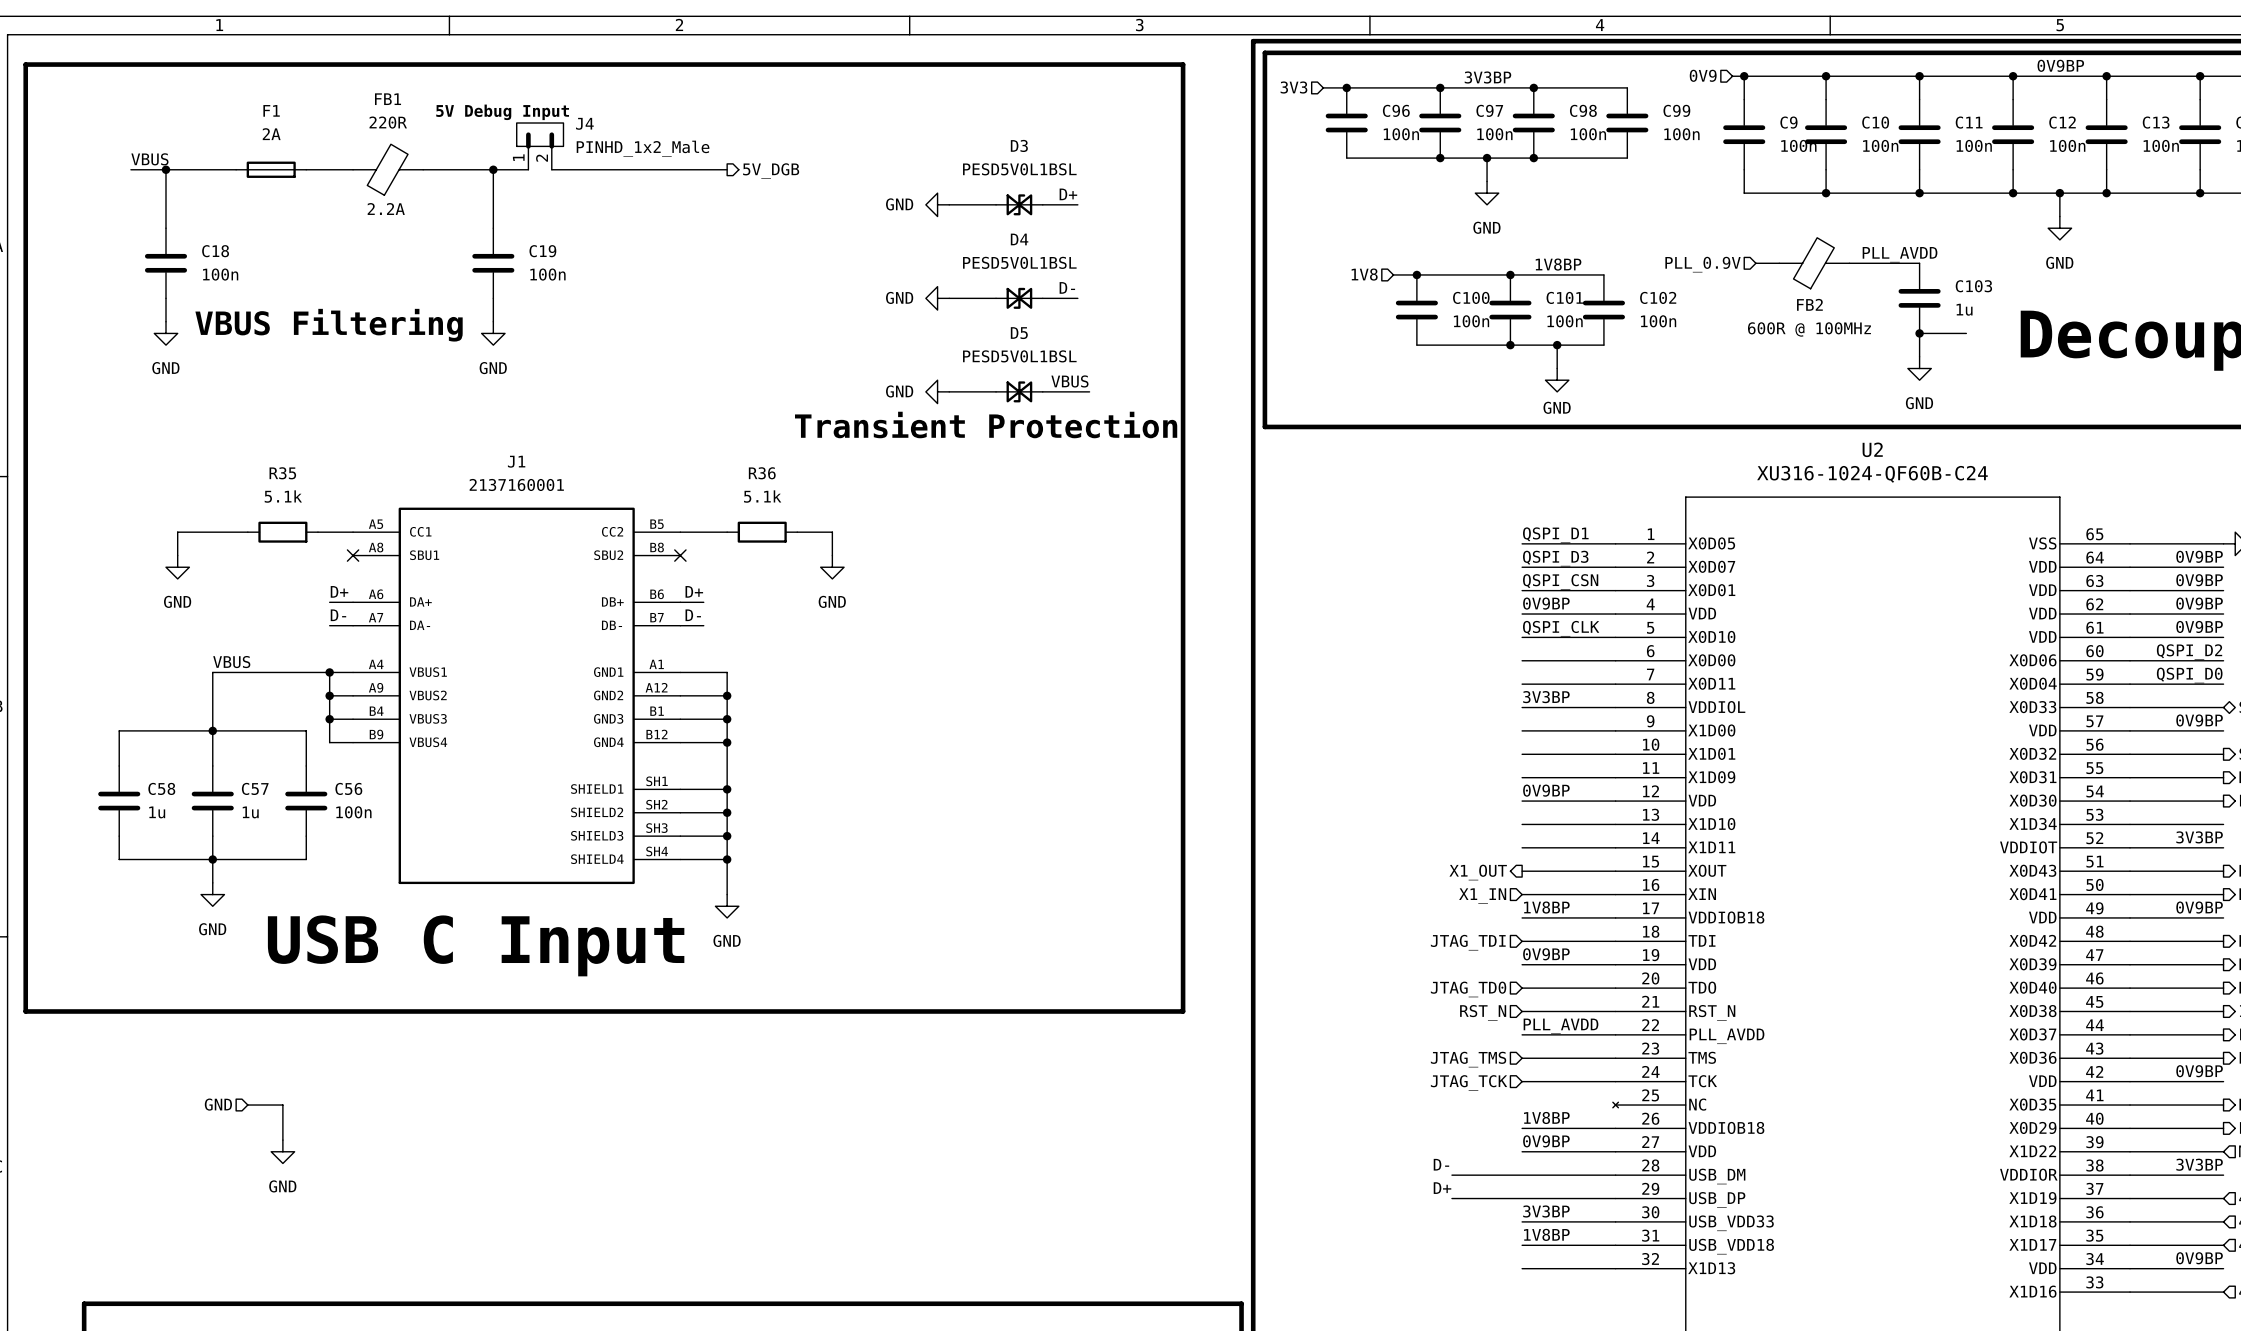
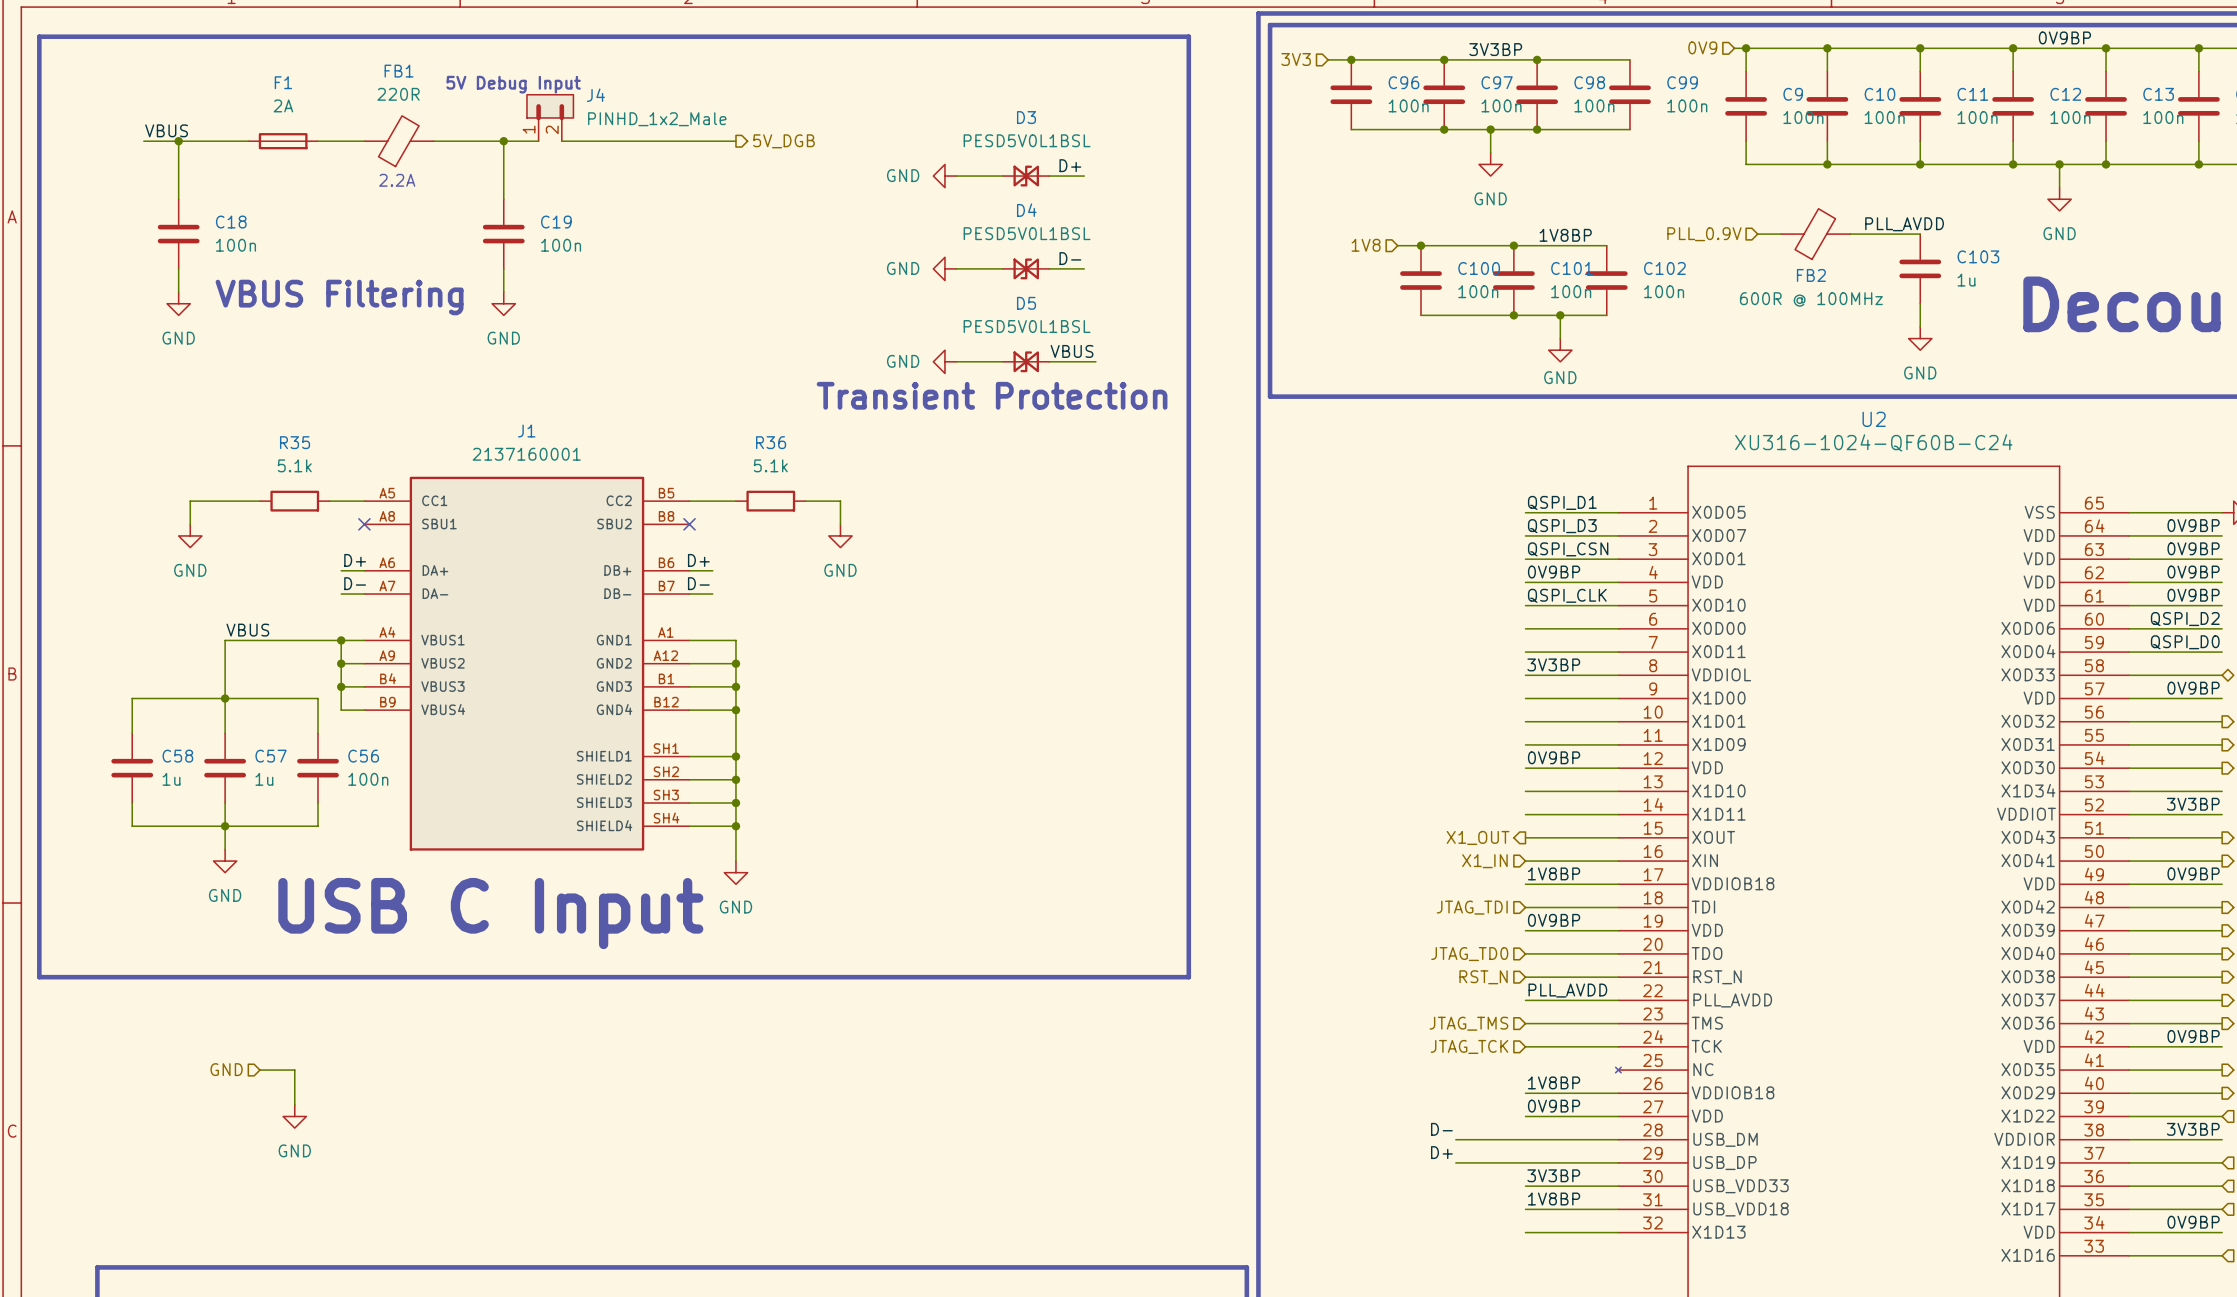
wire: (1919, 333) (1966, 333) -> none
junction: (1919, 333) -> none

